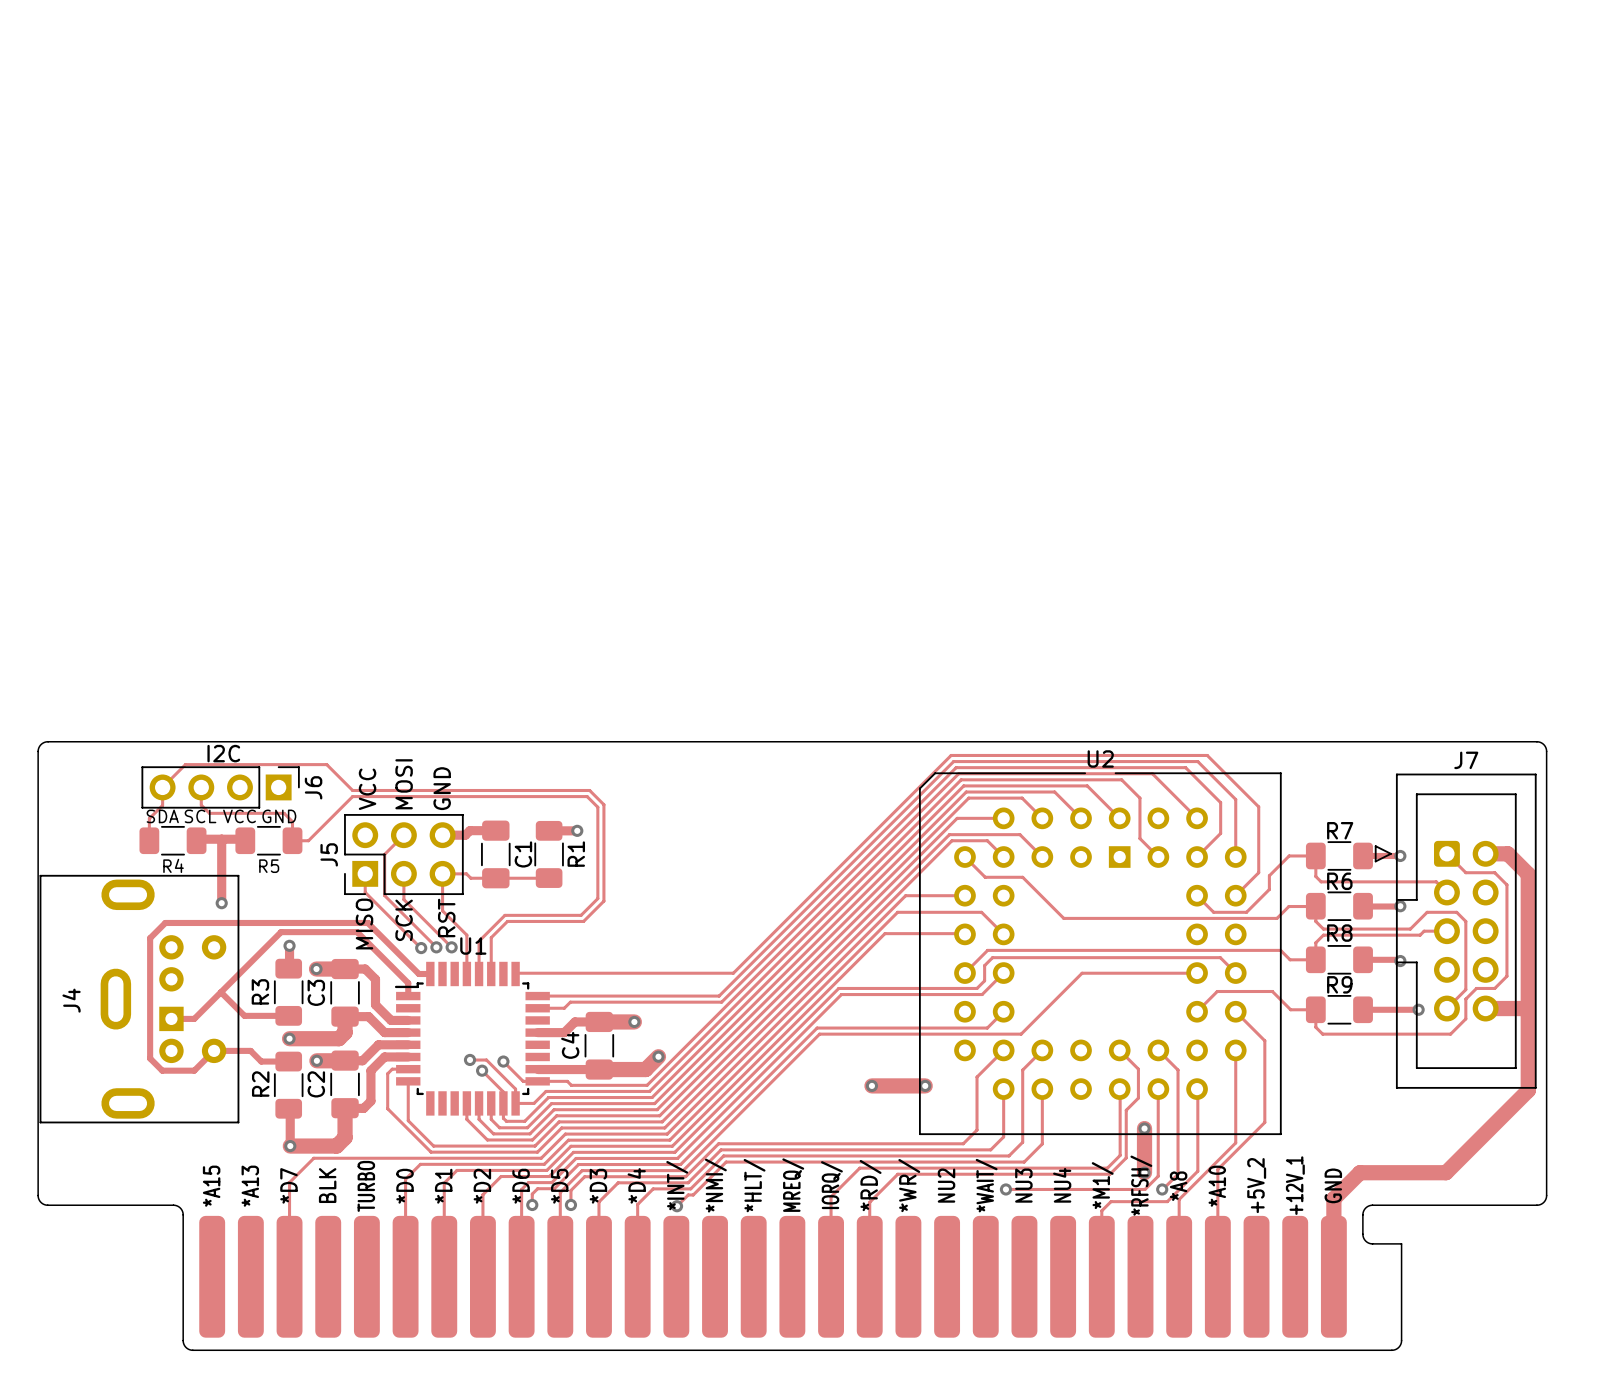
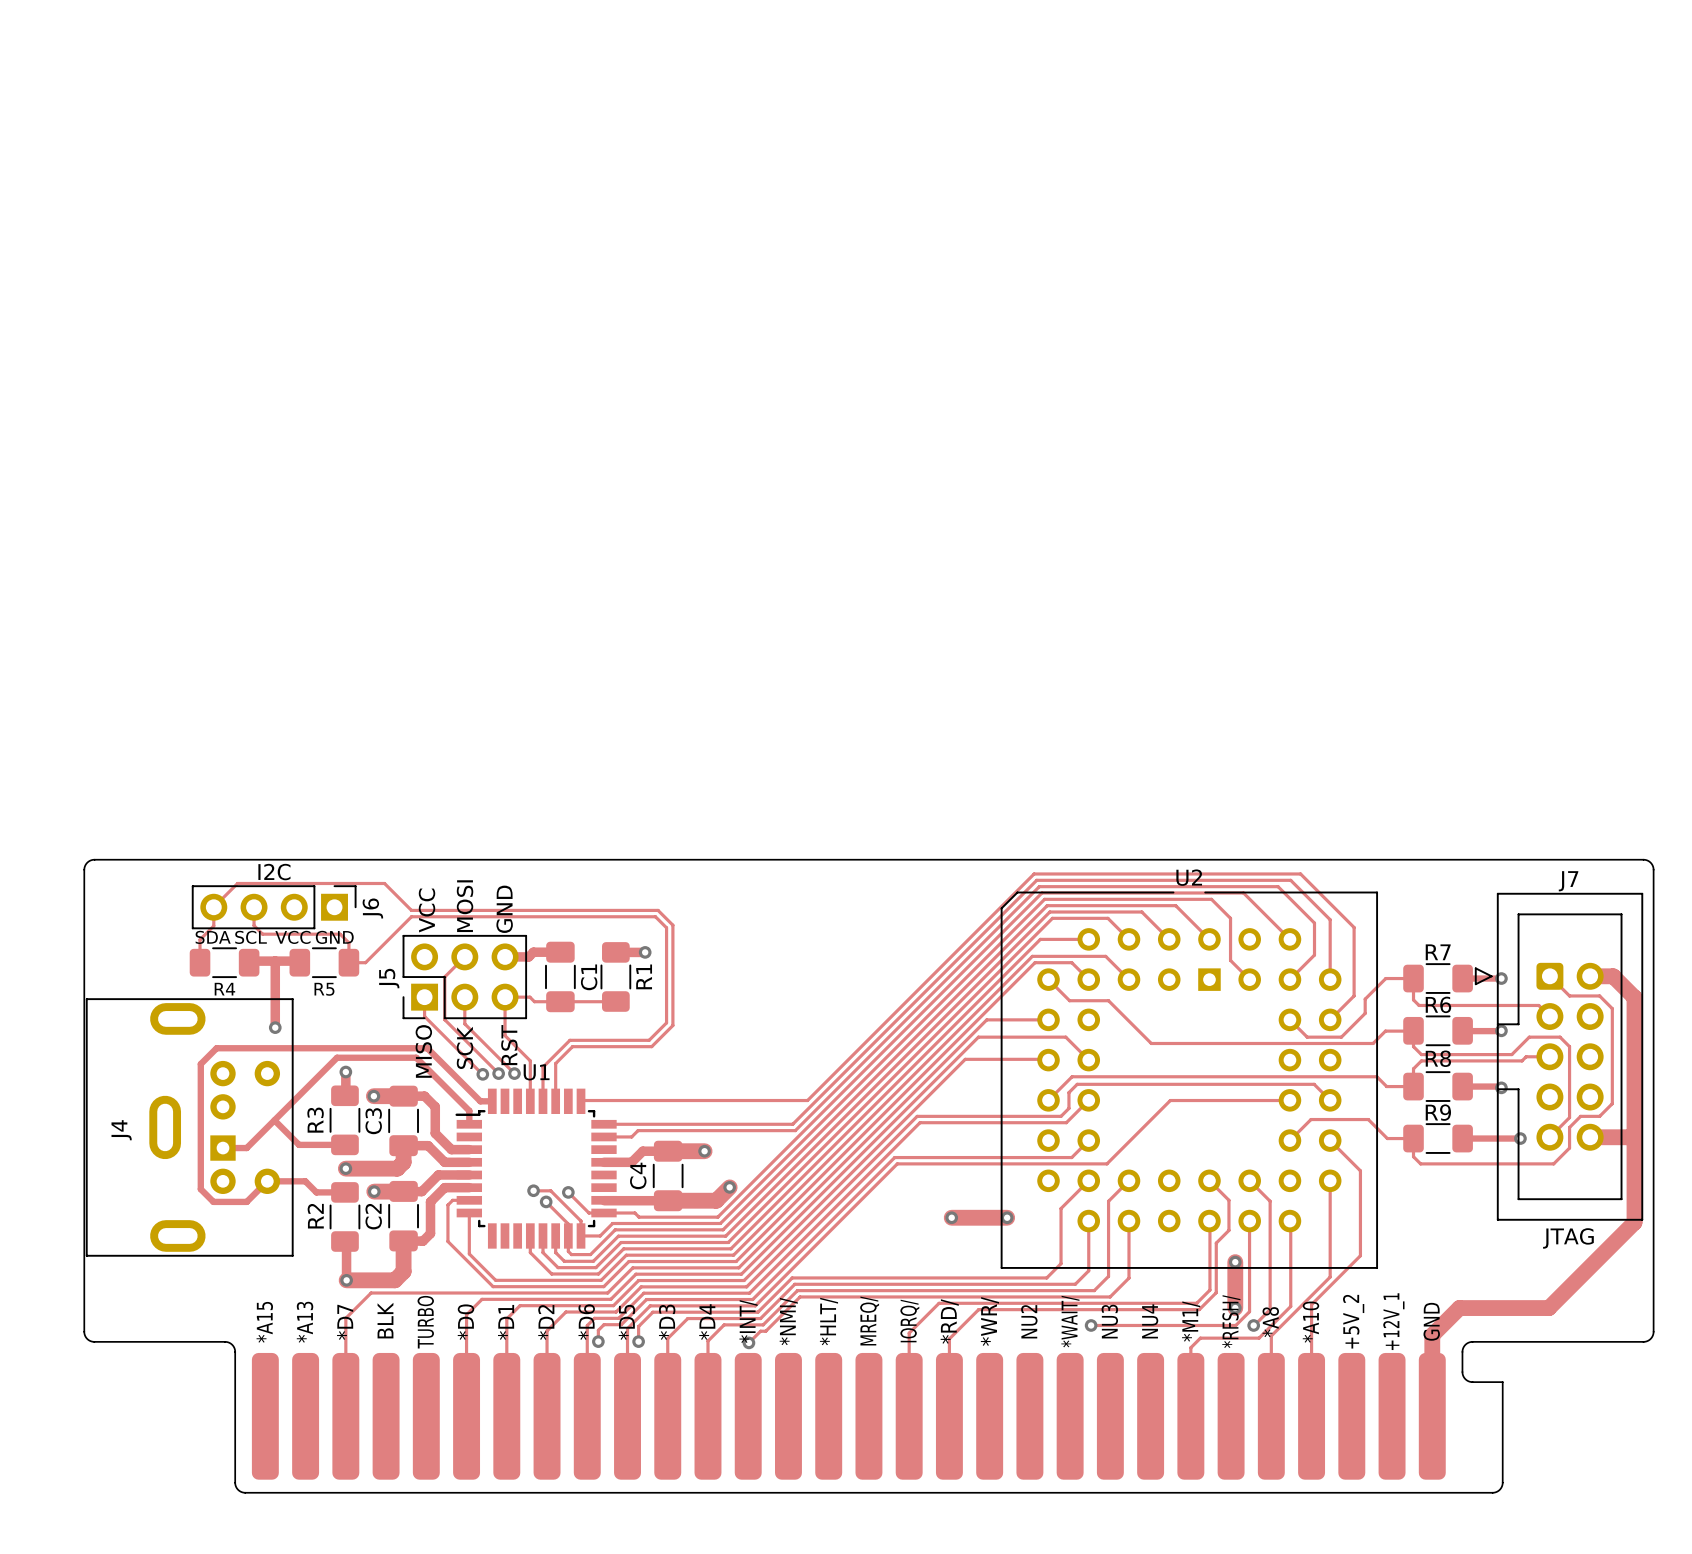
text: none -> JTAG (1568, 1238)

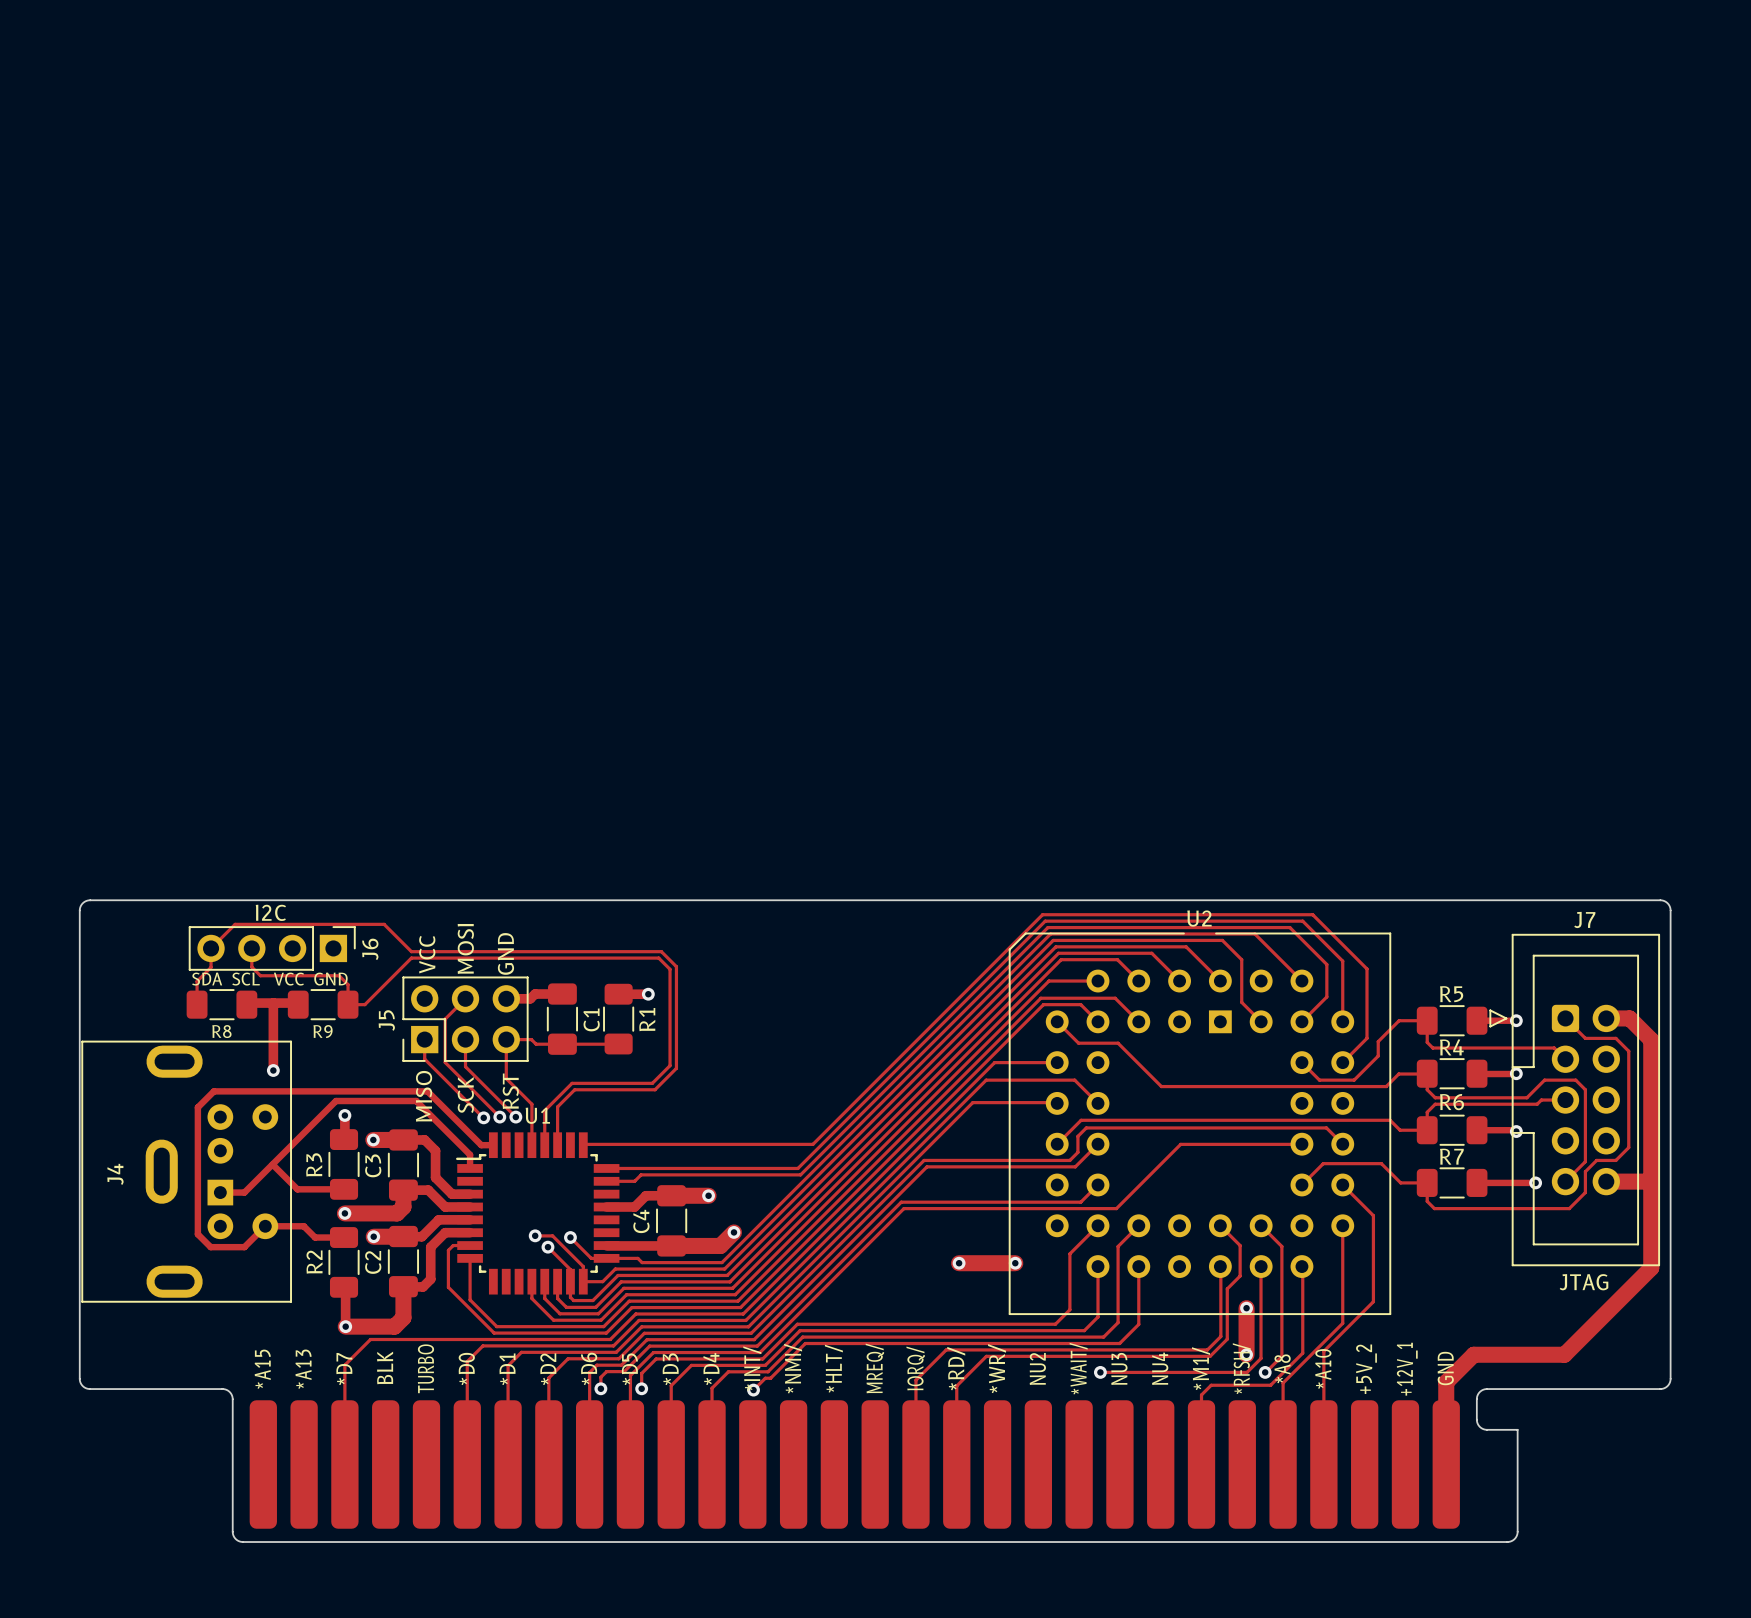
R7 name: R7 (1438, 952) -> R5 (1451, 994)
R4 name: R4 (224, 989) -> R8 (221, 1031)
R5 name: R5 (324, 989) -> R9 (323, 1031)
R6 name: R6 (1438, 1004) -> R4 (1451, 1047)
R8 name: R8 (1438, 1058) -> R6 (1452, 1102)
R9 name: R9 (1438, 1112) -> R7 (1451, 1156)

